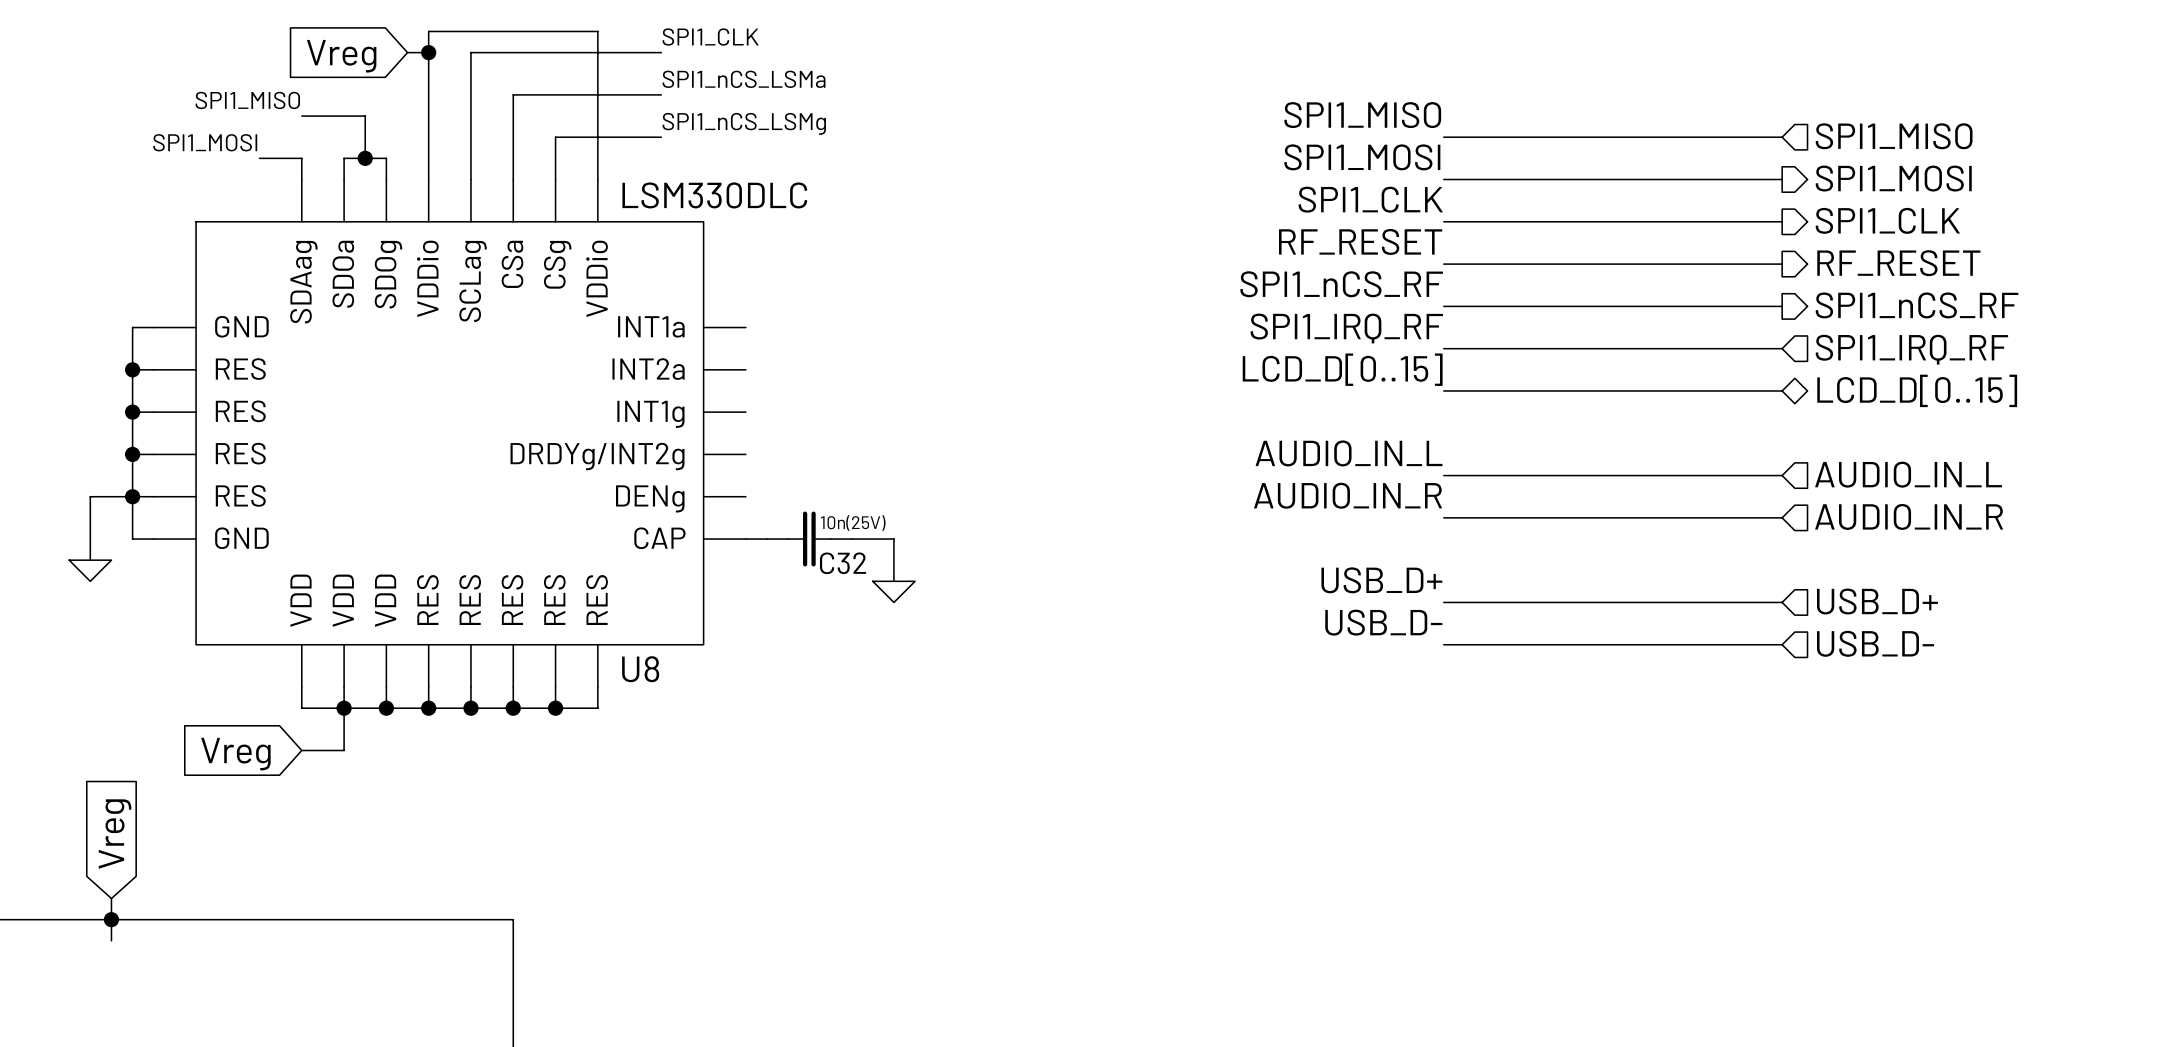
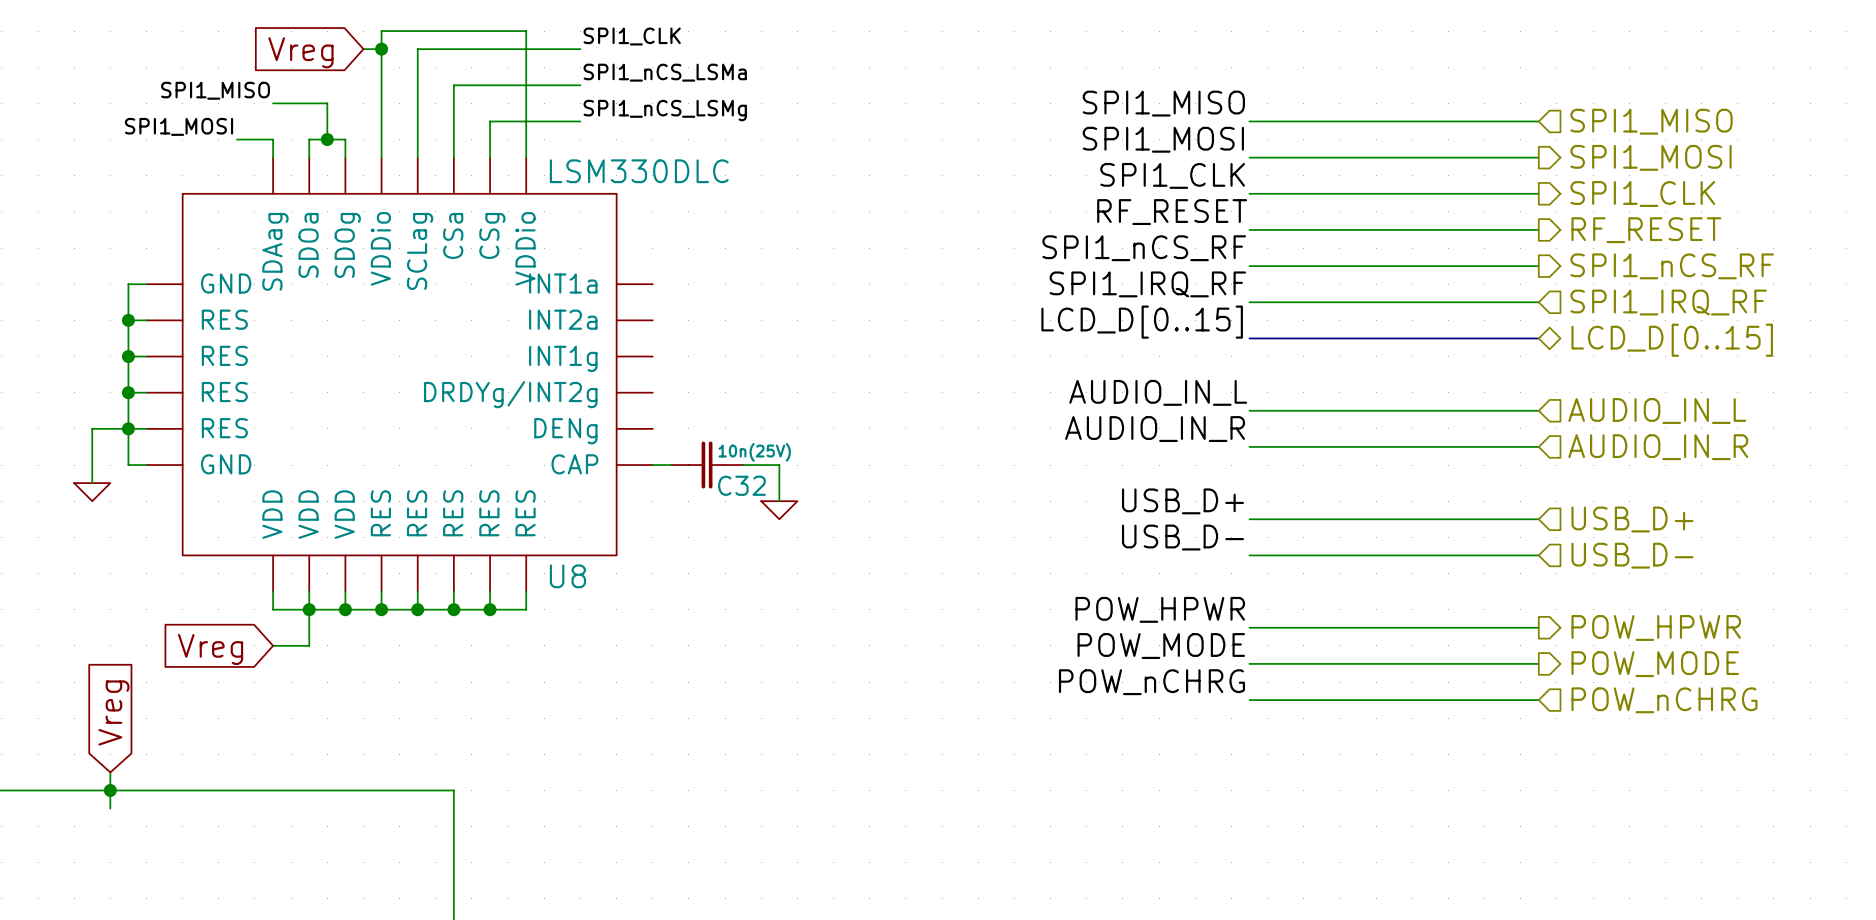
label: none -> POW_HPWR (1160, 609)
hierarchical label: none -> POW_HPWR (1656, 627)
wire: none -> (1249, 627) (1538, 627)
label: none -> POW_MODE (1161, 646)
hierarchical label: none -> POW_MODE (1655, 664)
wire: none -> (1249, 663) (1538, 663)
label: none -> POW_nCHRG (1151, 682)
wire: none -> (1249, 700) (1538, 700)
hierarchical label: none -> POW_nCHRG (1664, 700)

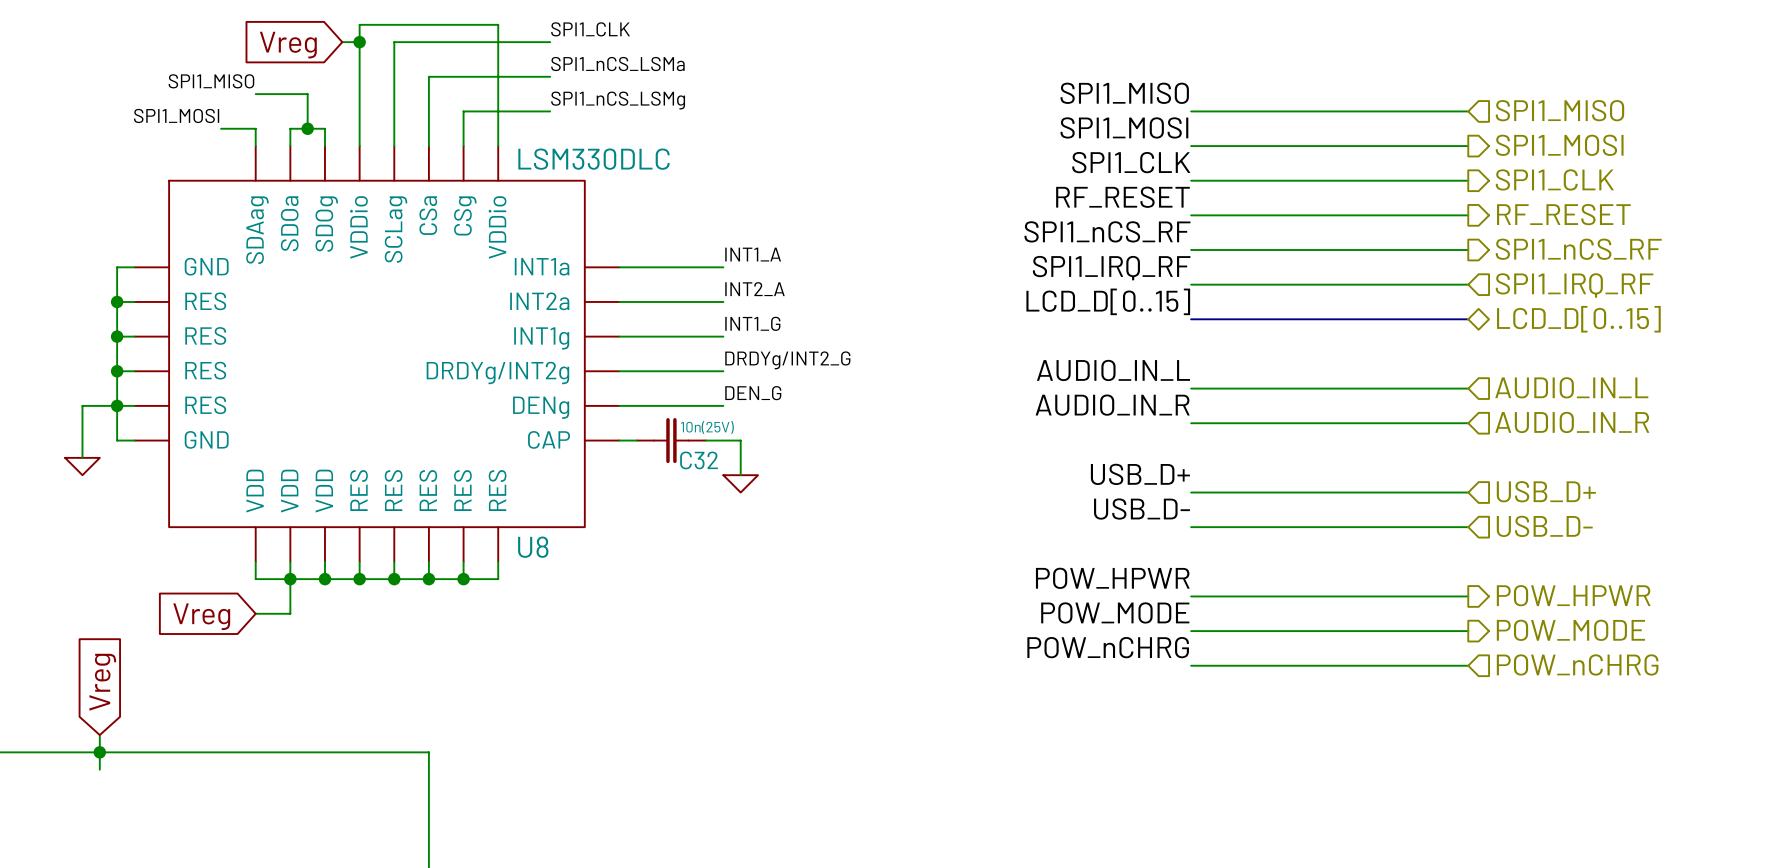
label: none -> INT1_A (753, 254)
wire: none -> (619, 267) (723, 267)
label: none -> INT2_A (754, 289)
wire: none -> (619, 301) (723, 301)
label: none -> INT1_G (752, 323)
wire: none -> (619, 336) (723, 336)
label: none -> DRDYg/INT2_G (787, 360)
wire: none -> (619, 371) (723, 371)
label: none -> DEN_G (753, 393)
wire: none -> (619, 405) (723, 405)

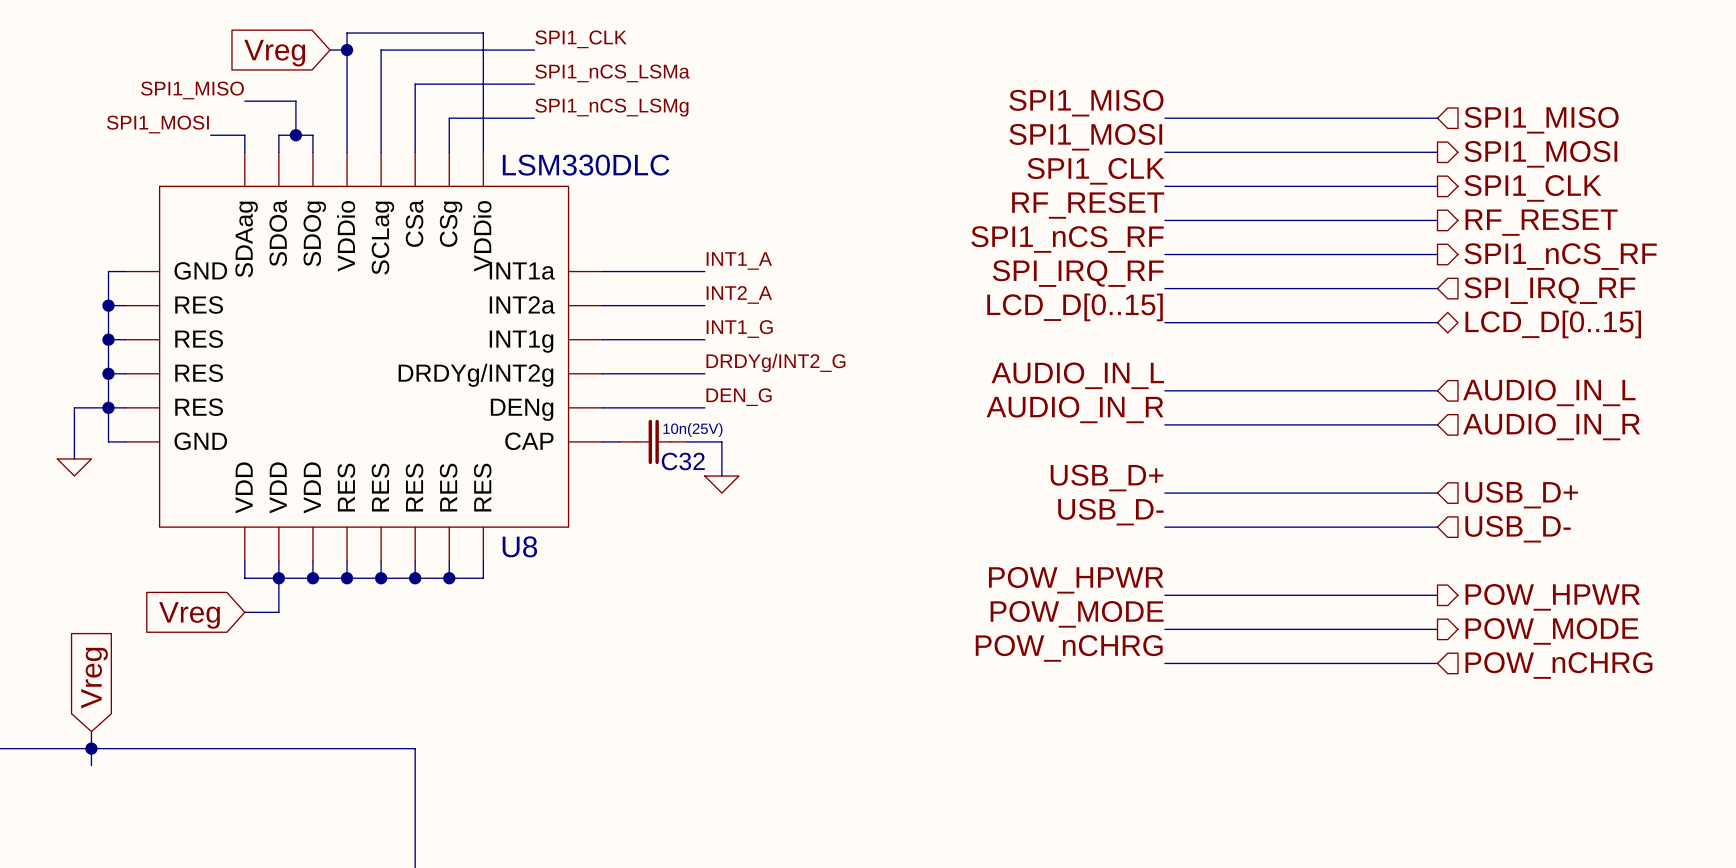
label: SPI1_IRQ_RF (1111, 268) -> SPI_IRQ_RF (1078, 273)
hierarchical label: SPI1_IRQ_RF (1574, 285) -> SPI_IRQ_RF (1549, 290)

